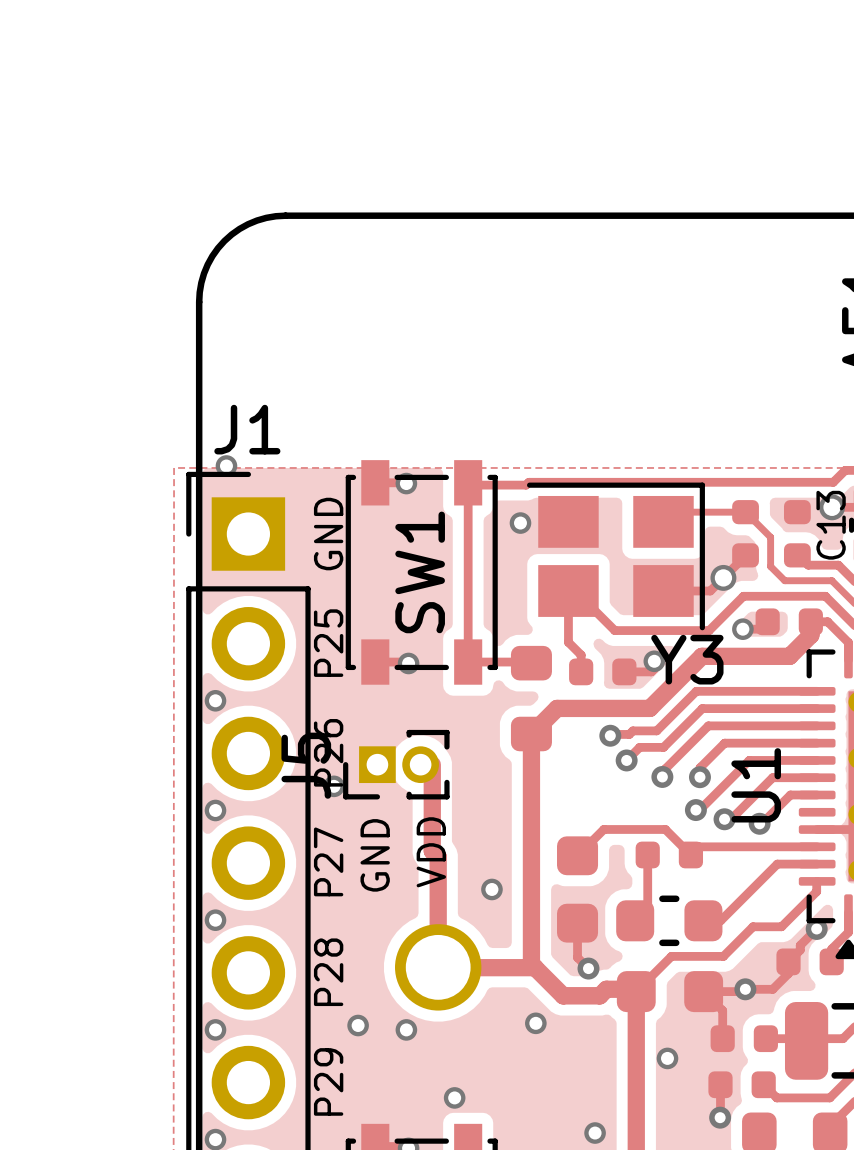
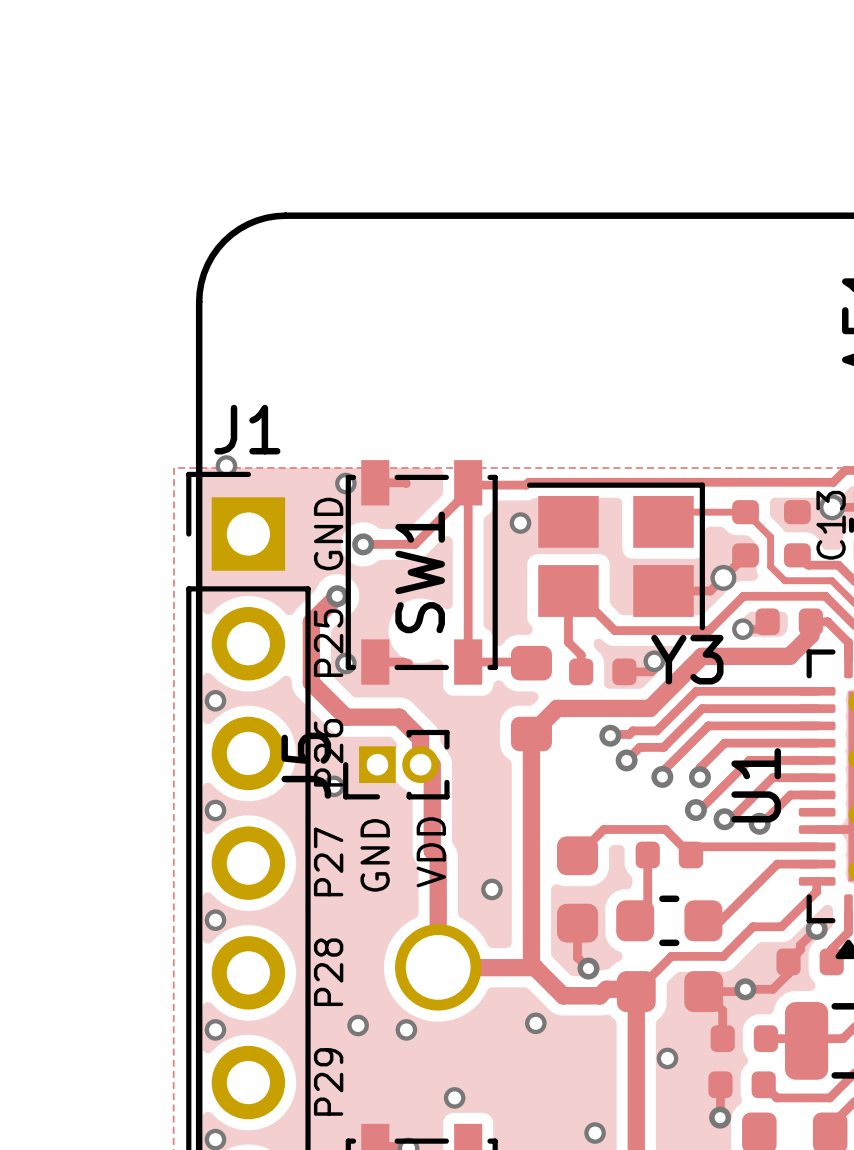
via position: (406, 483) -> (345, 483)
track: none -> (468, 491) (415, 544) (363, 544)
via: none -> (363, 544)
track: none -> (337, 596) (311, 622) (311, 682) (345, 717) (399, 717) (420, 738) (420, 764)
via: none -> (337, 596)
via position: (408, 663) -> (345, 663)

